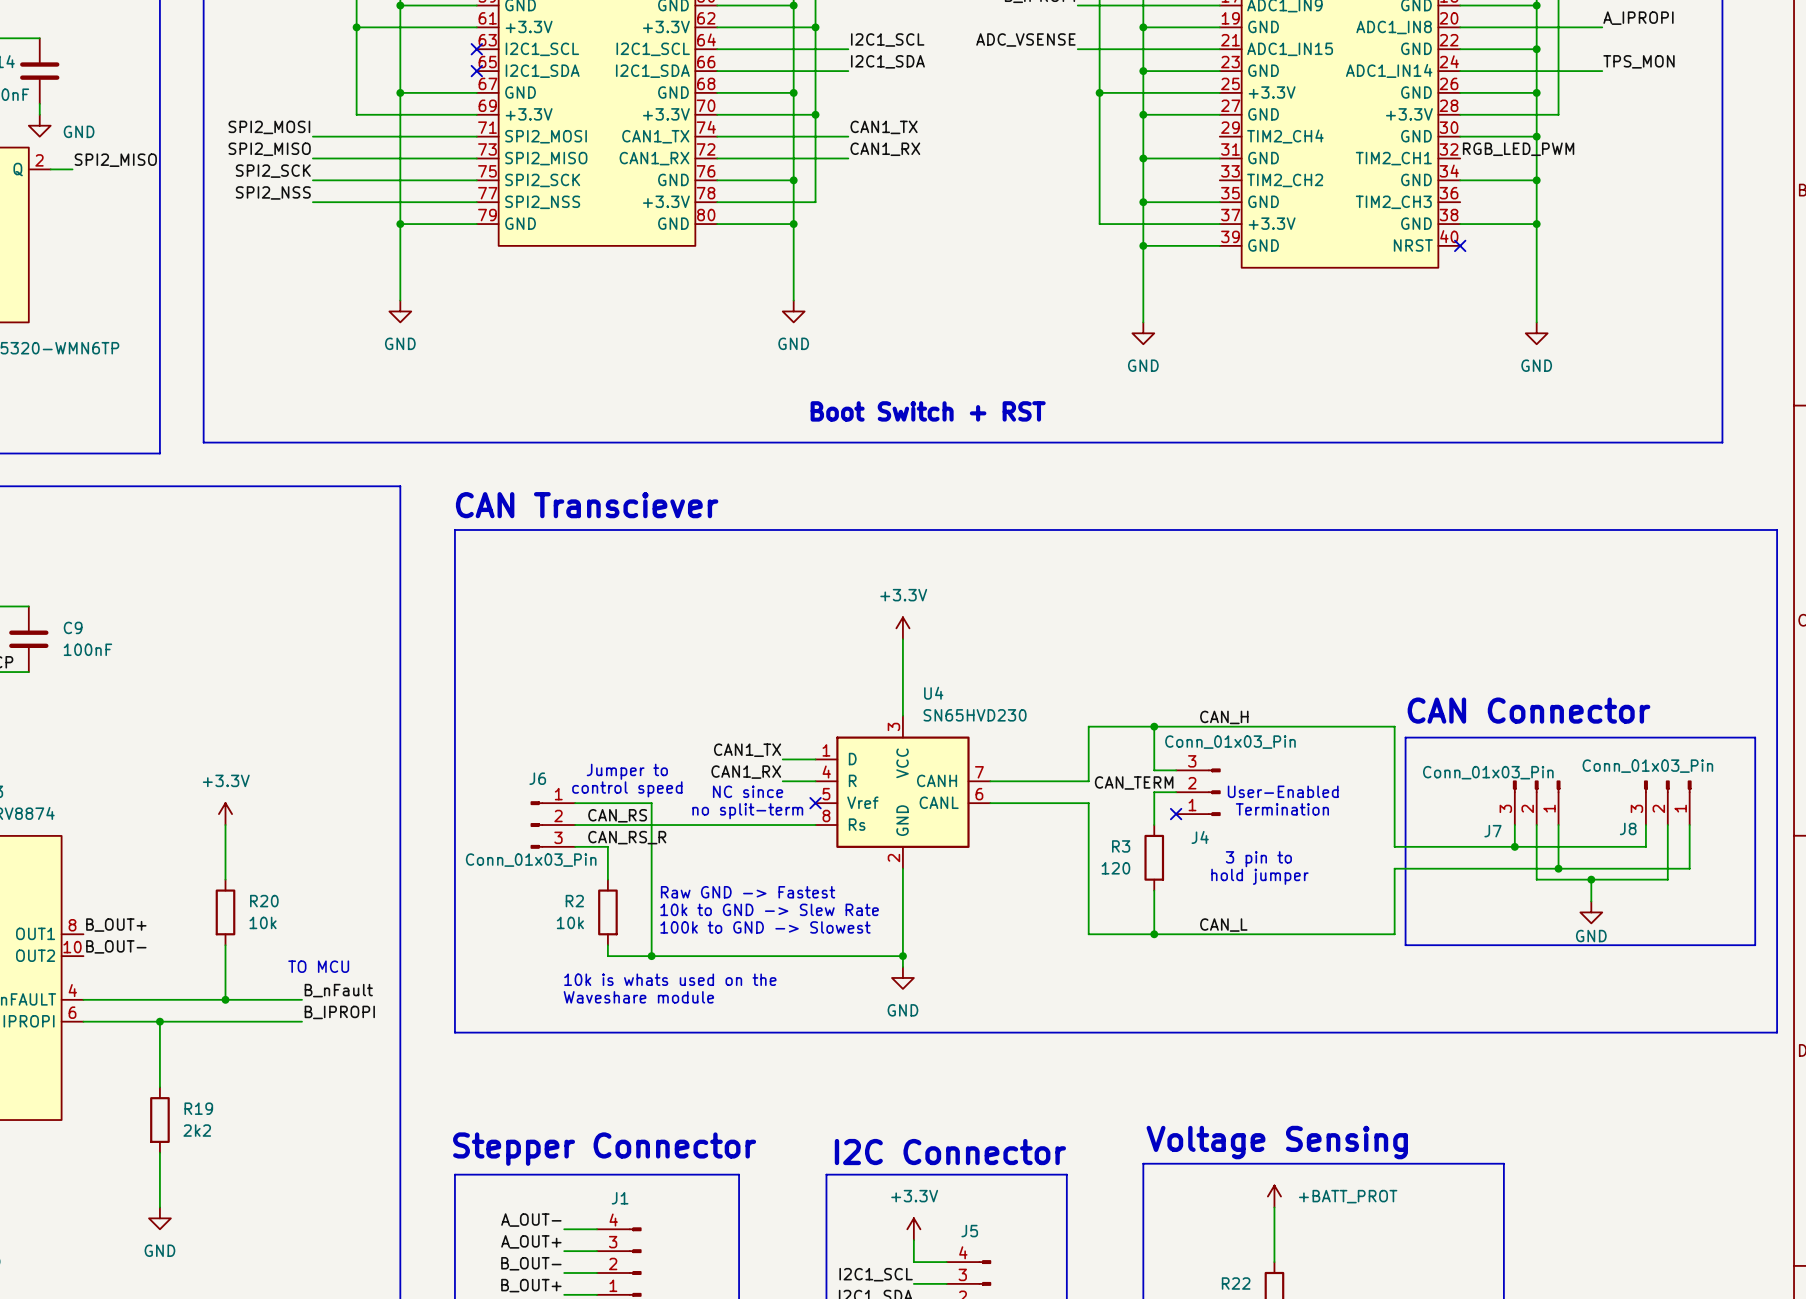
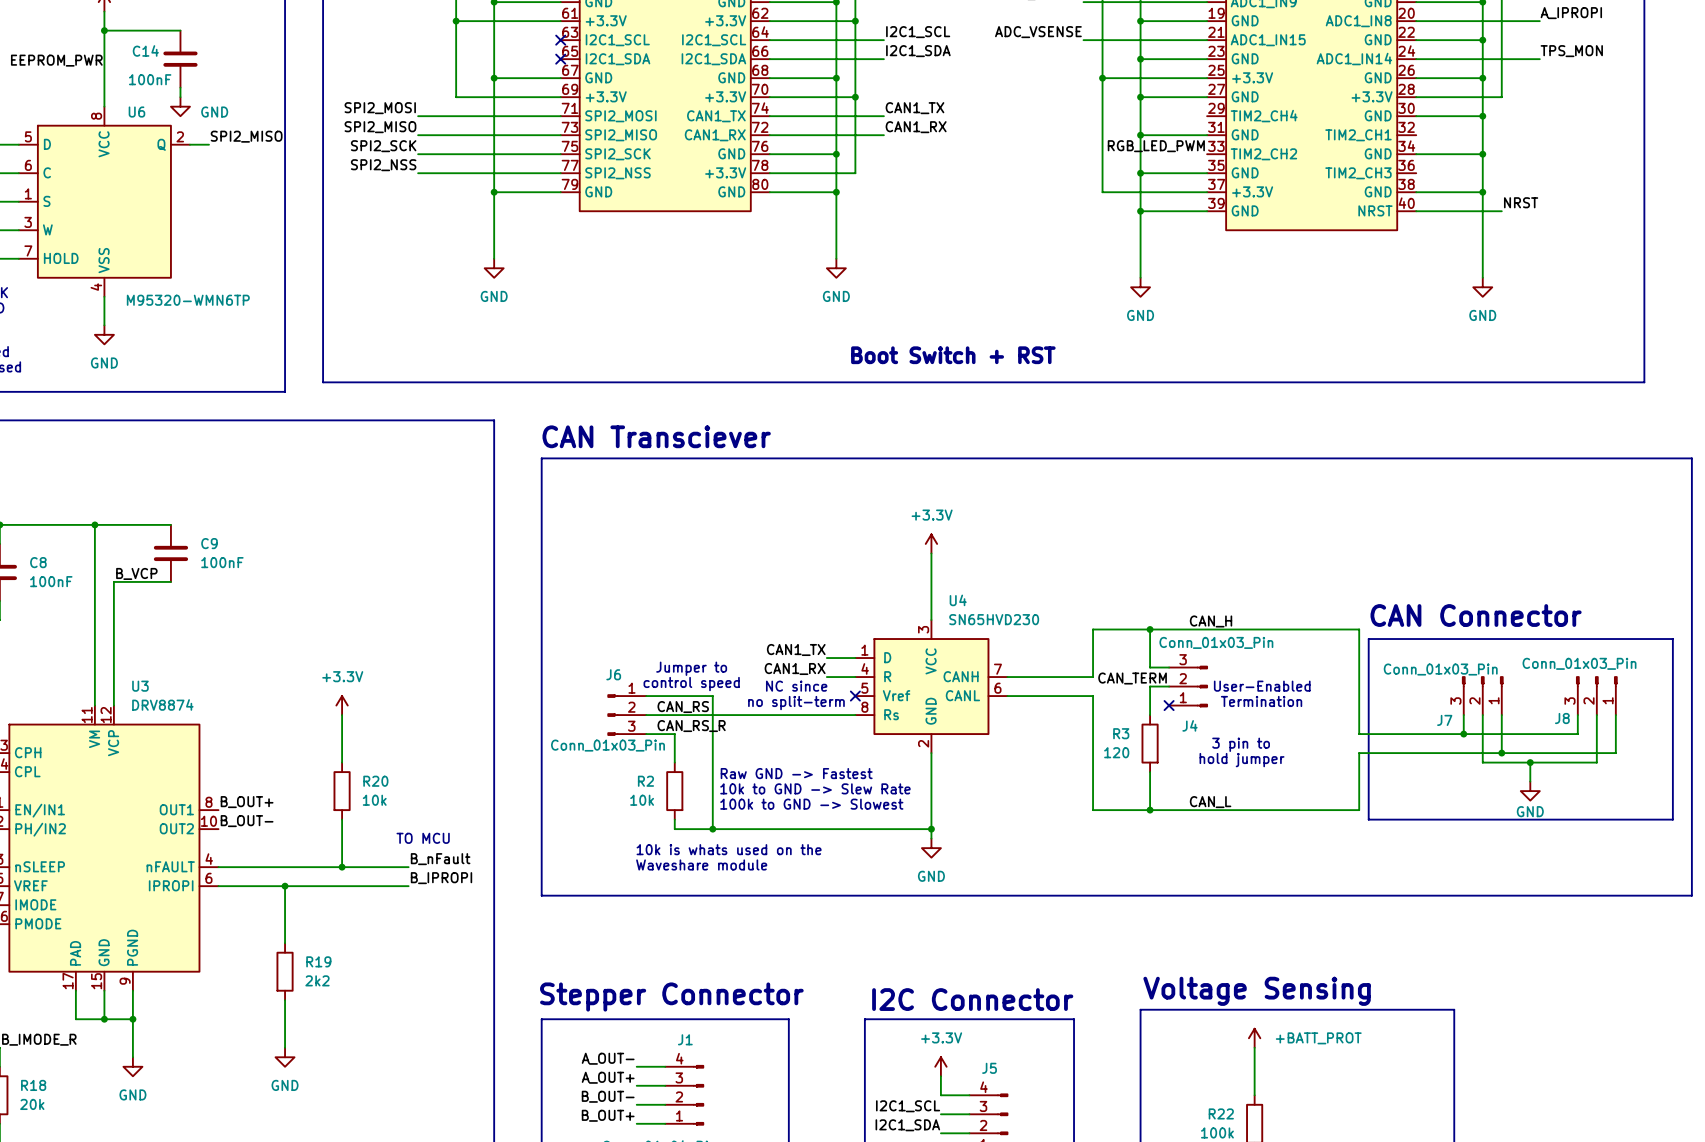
label: RGB_LED_PWM (1518, 149) -> none
label: none -> RGB_LED_PWM (1156, 146)
label: none -> NRST (1521, 202)
wire: none -> (1416, 211) (1501, 211)
no-connect mark: (1460, 245) -> none

